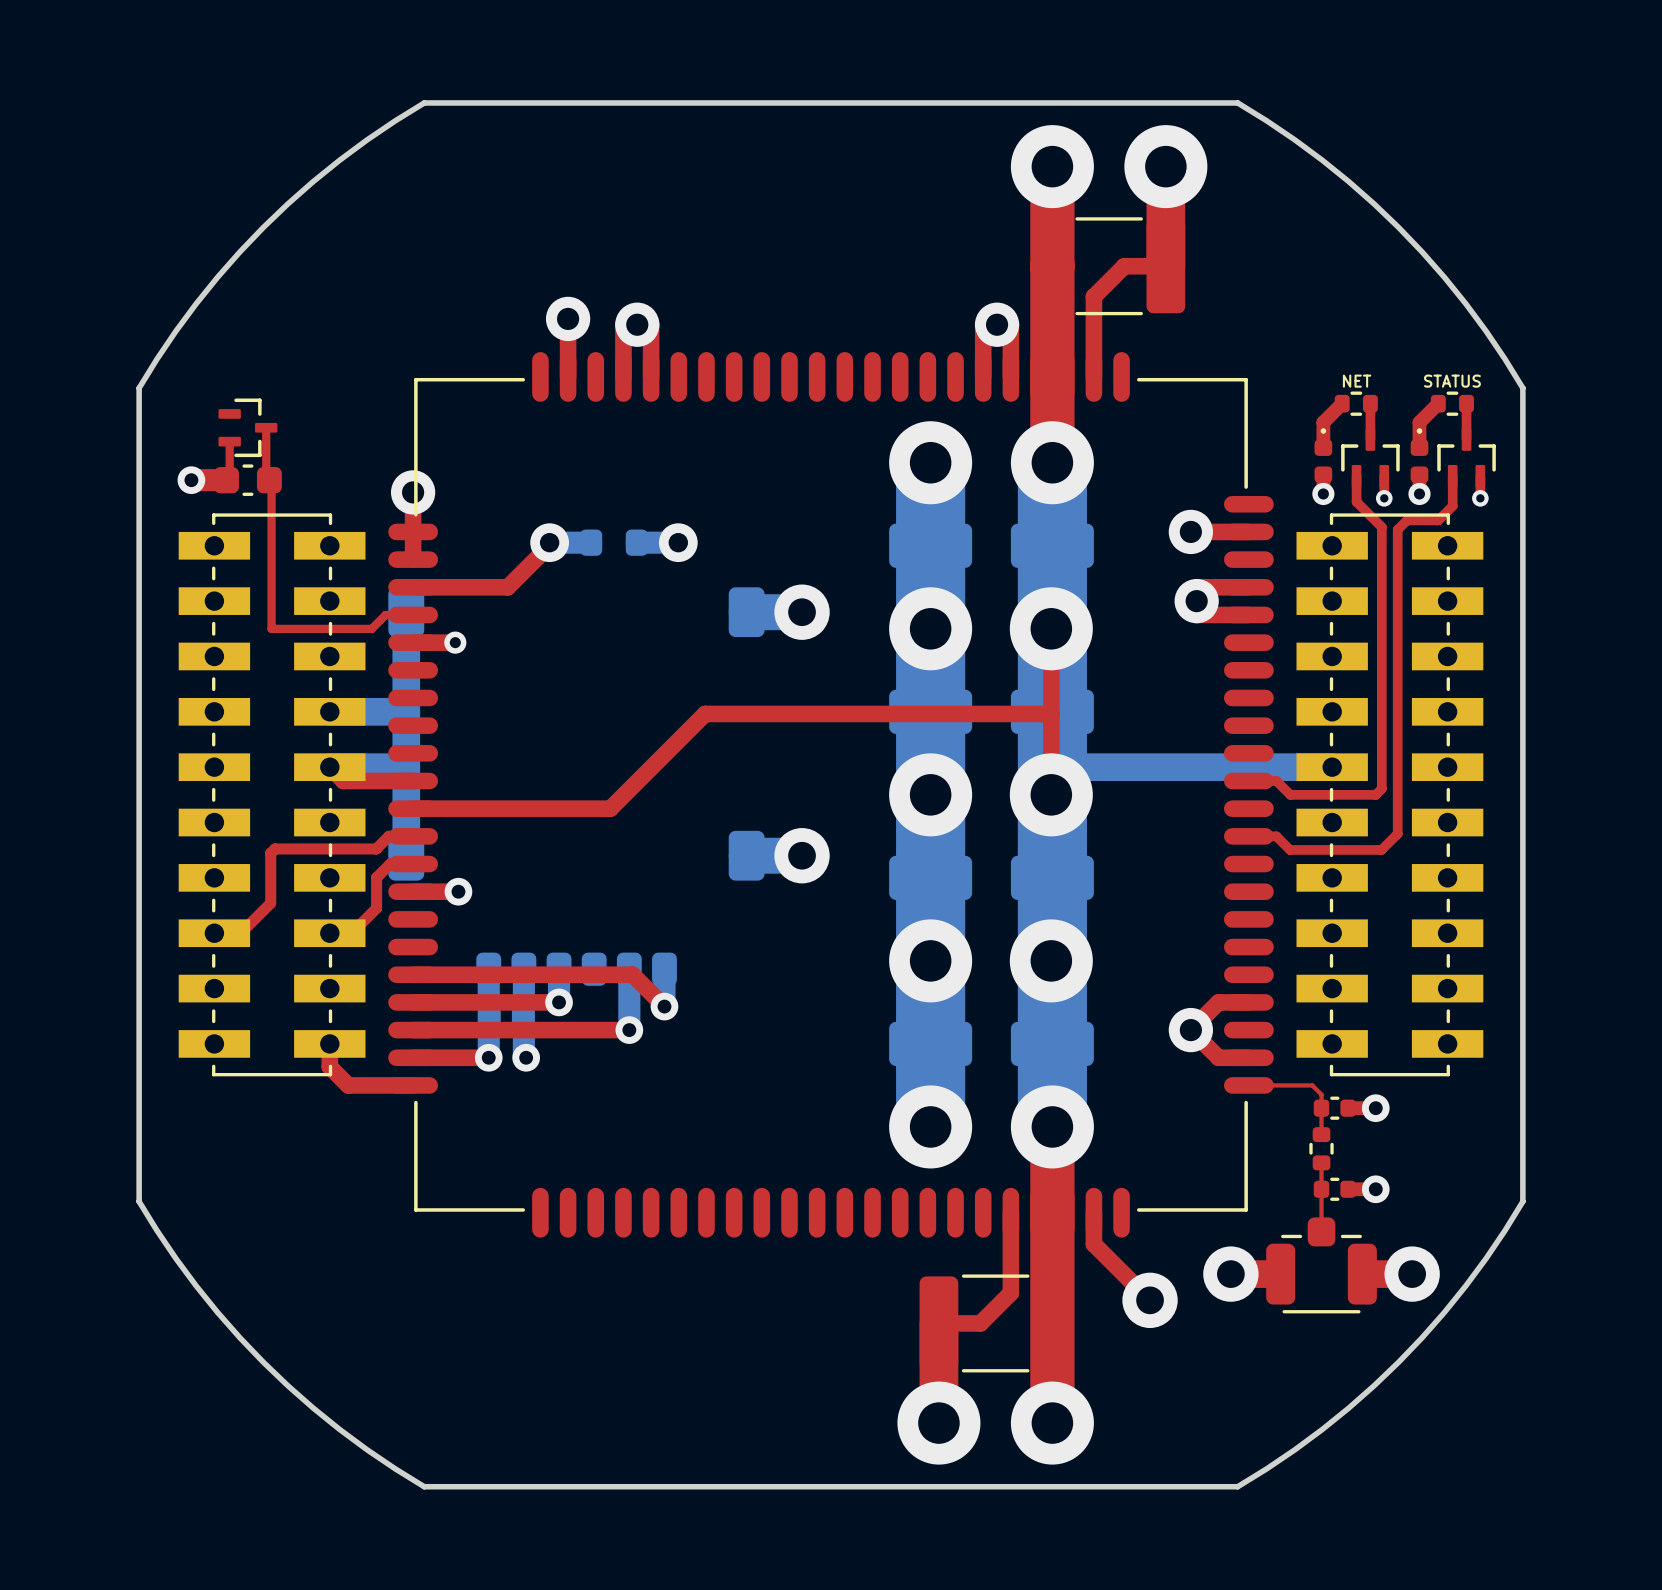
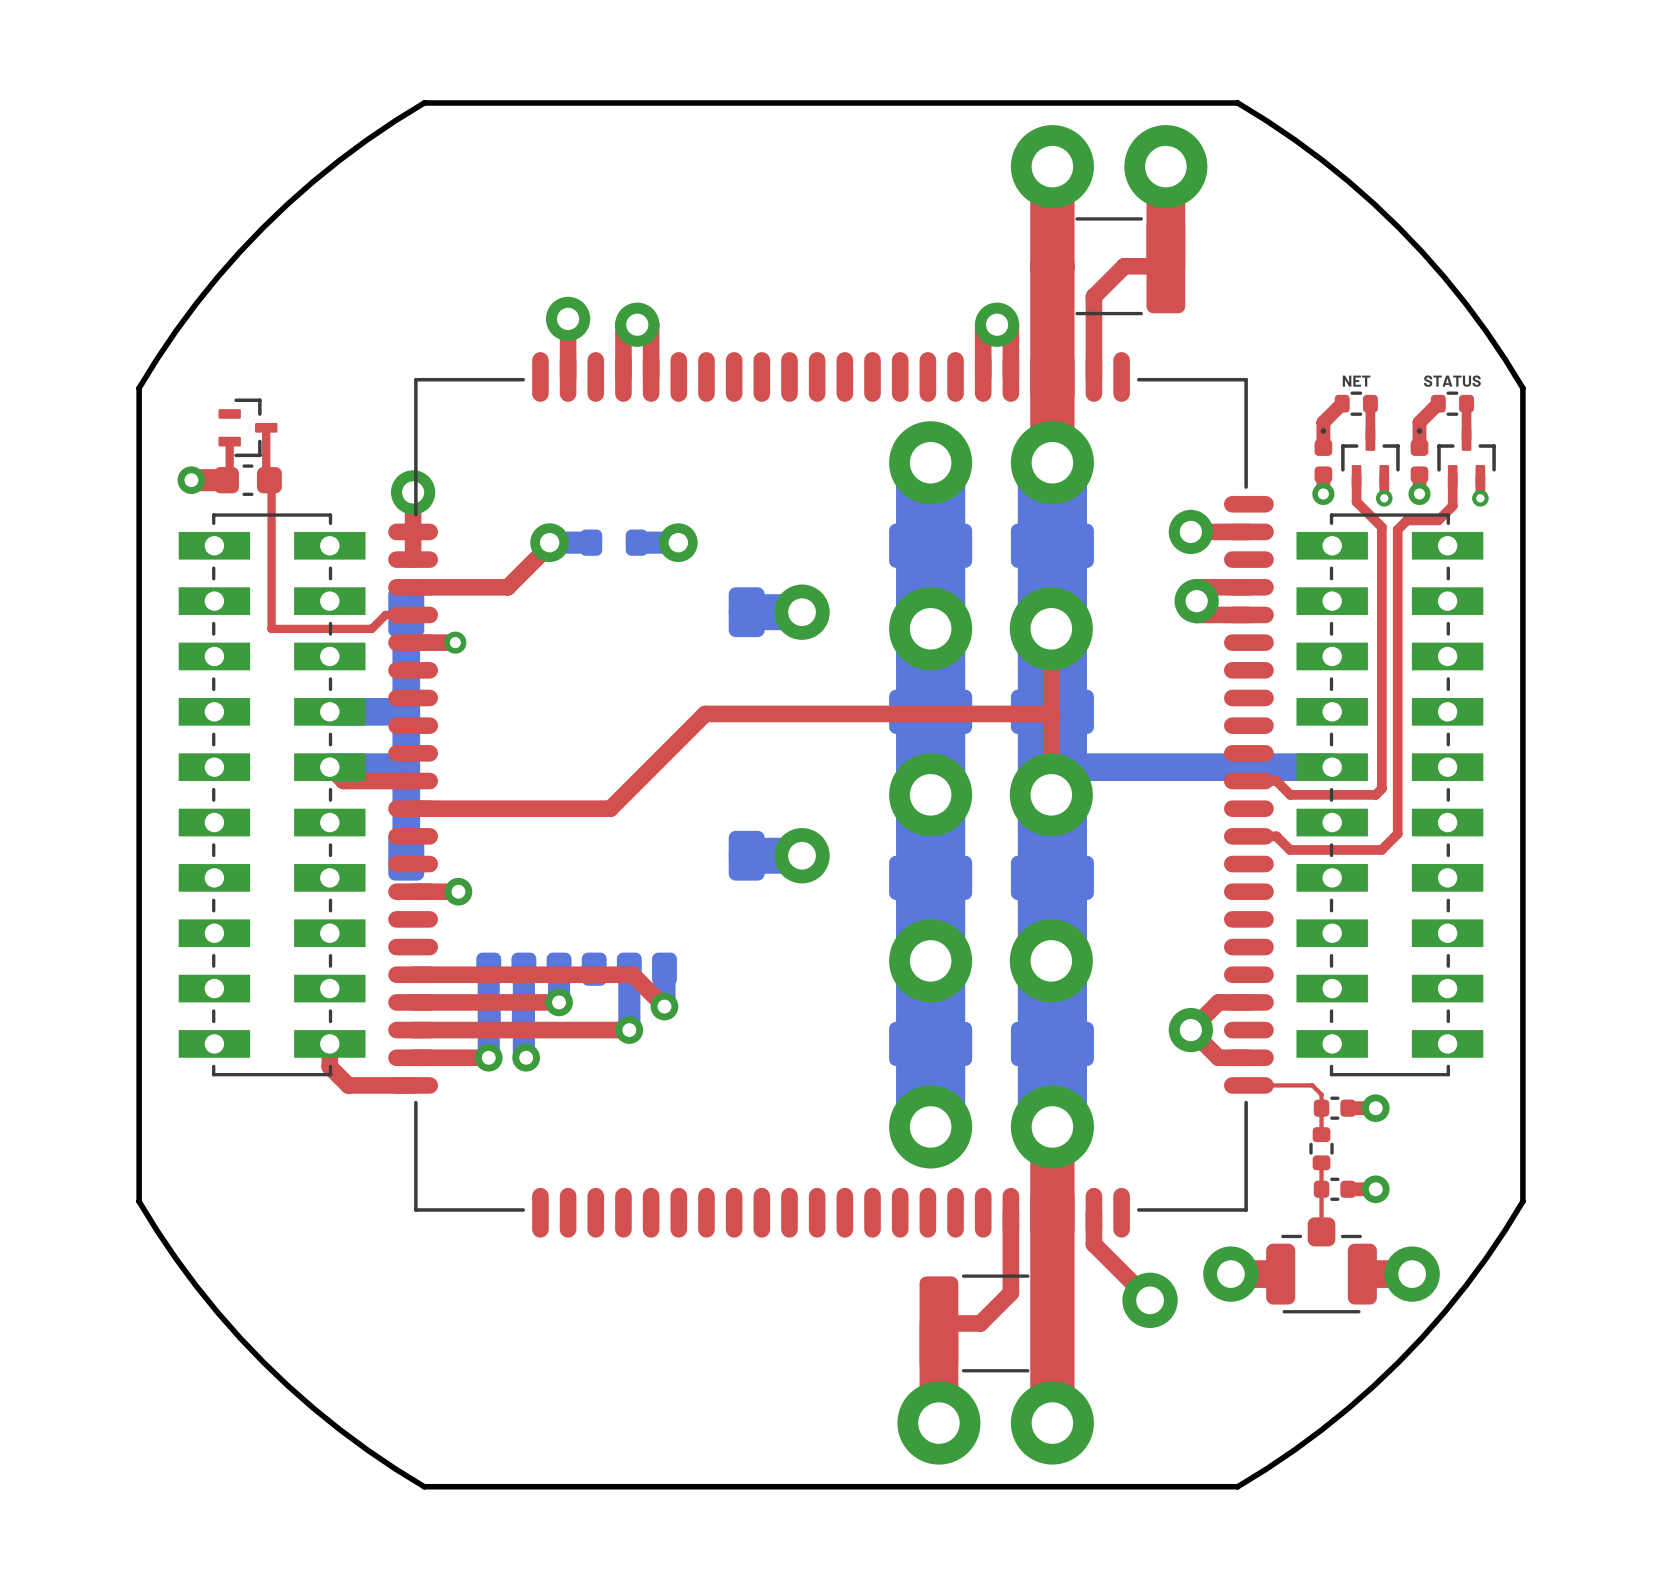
top track: (413, 836) (388, 836) (376, 848) (274, 848) (270, 853) (270, 903) (240, 933) (214, 933) -> none
top track: (413, 864) (390, 864) (376, 877) (376, 908) (351, 933) (329, 933) -> none

